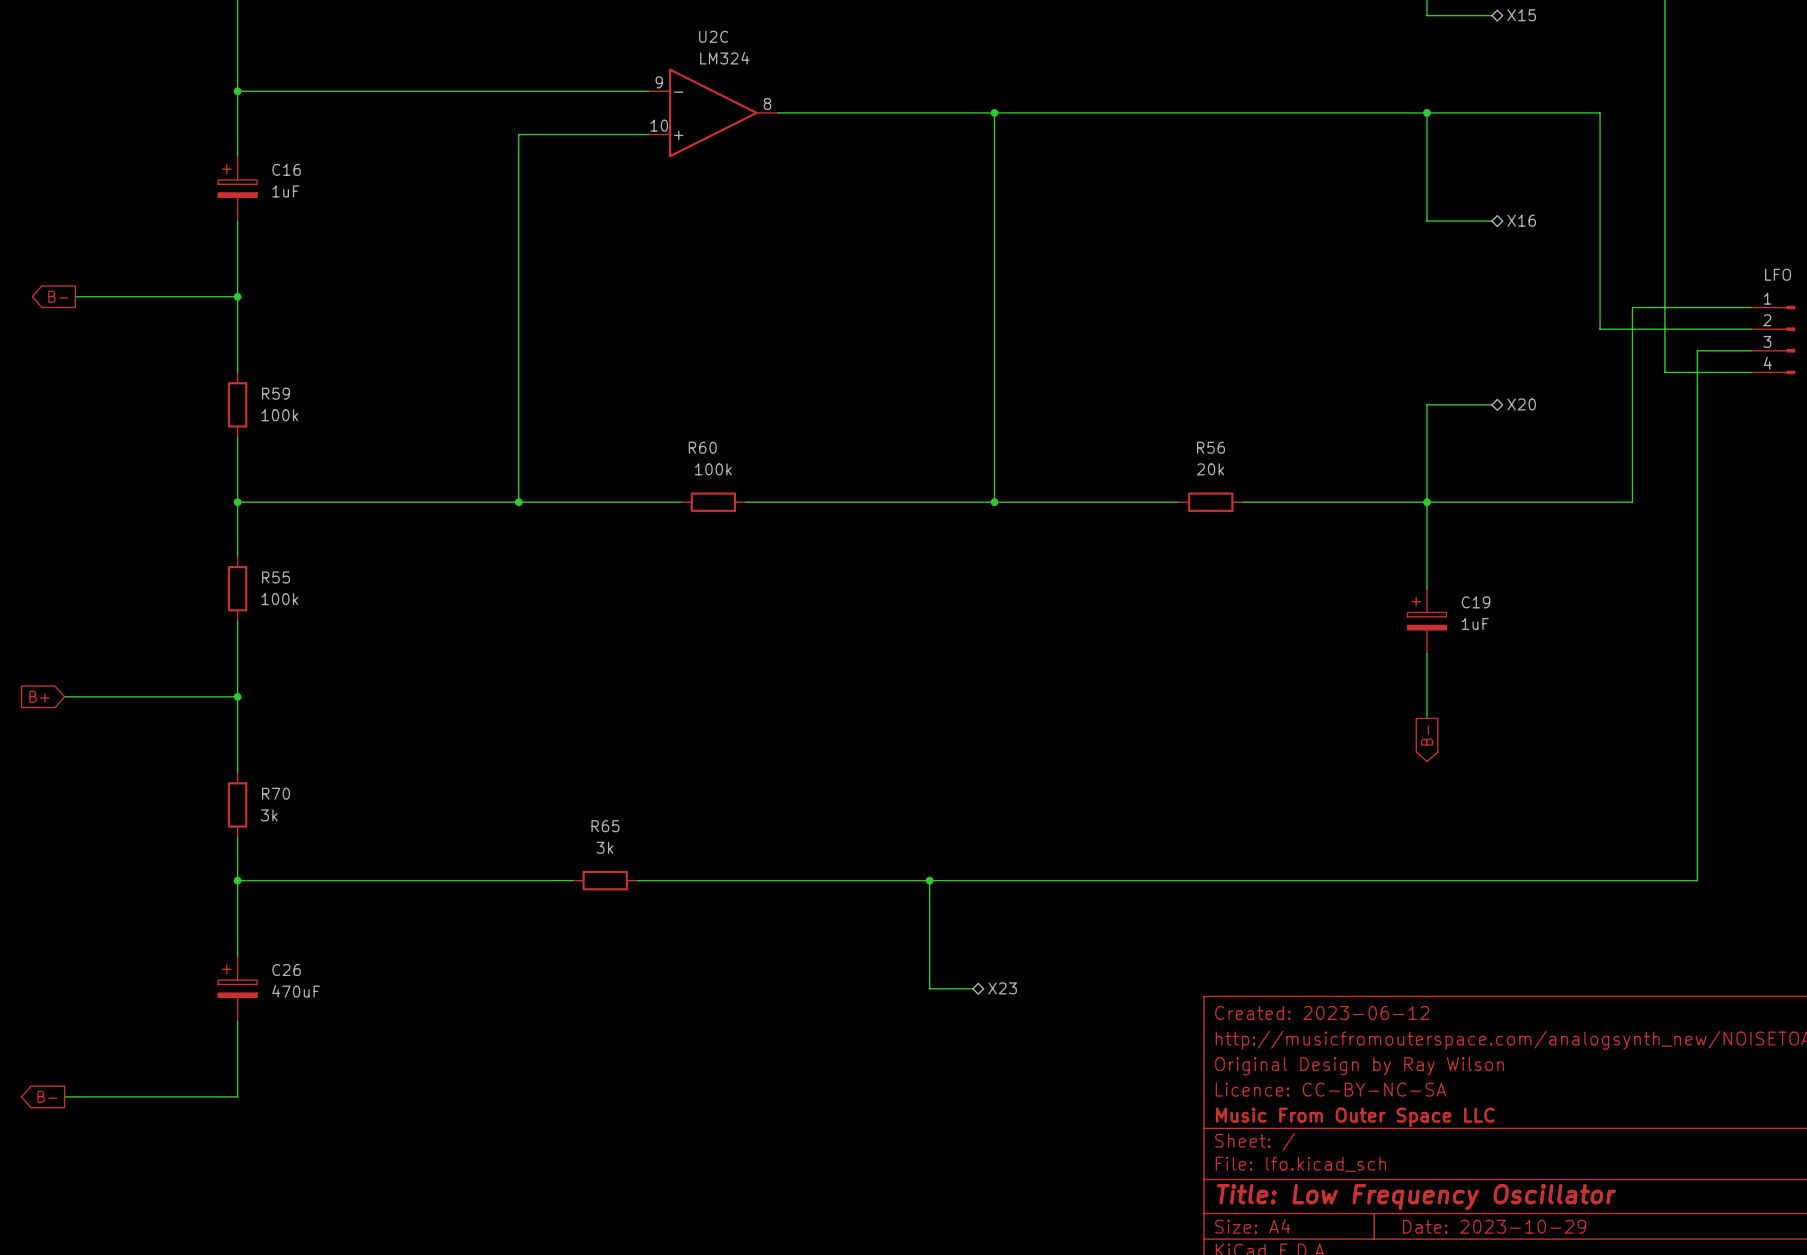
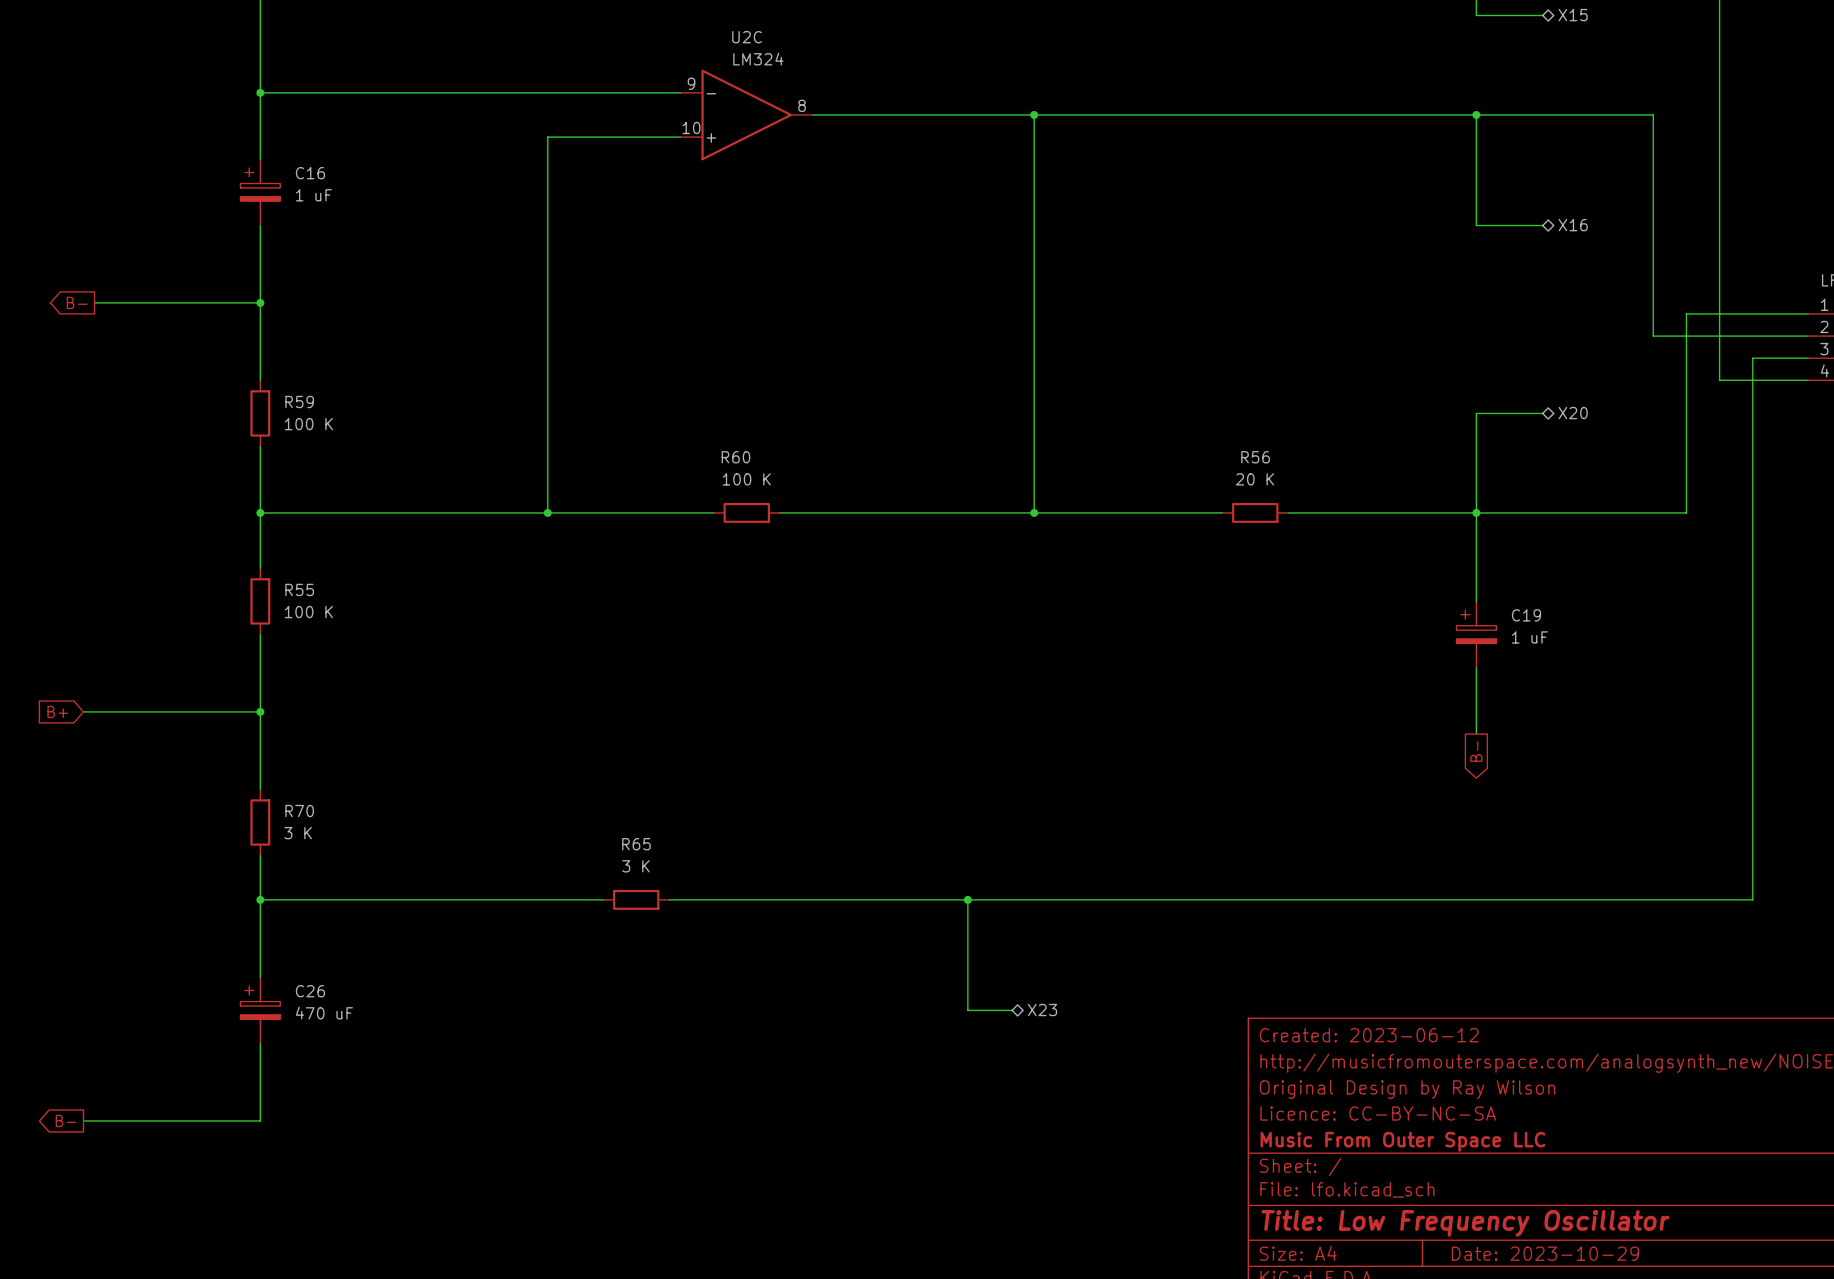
C16 value: 1uF (285, 191) -> 1 uF (313, 195)
R59 value: 100k (279, 415) -> 100 K (308, 424)
R60 value: 100k (713, 469) -> 100 K (746, 479)
R56 value: 20k (1210, 469) -> 20 K (1255, 479)
R55 value: 100k (279, 599) -> 100 K (308, 612)
C19 value: 1uF (1475, 623) -> 1 uF (1529, 637)
R70 value: 3k (269, 815) -> 3 K (298, 833)
R65 value: 3k (604, 847) -> 3 K (635, 866)
C26 value: 470uF (296, 991) -> 470 uF (324, 1013)

